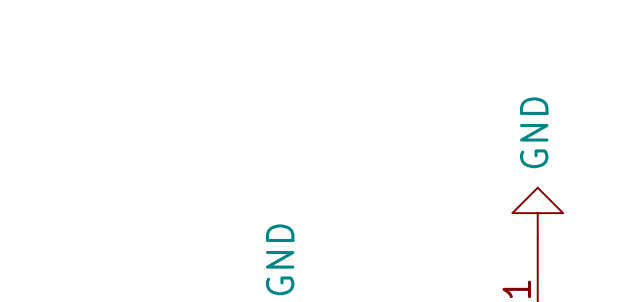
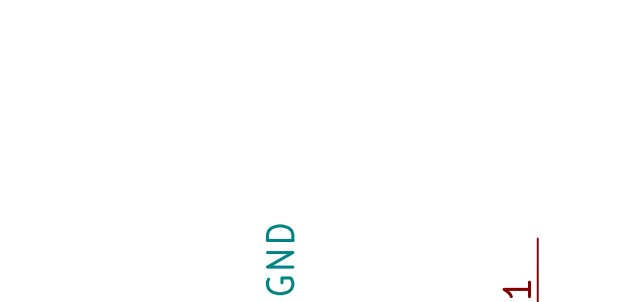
power symbol: GND (537, 213) -> none

